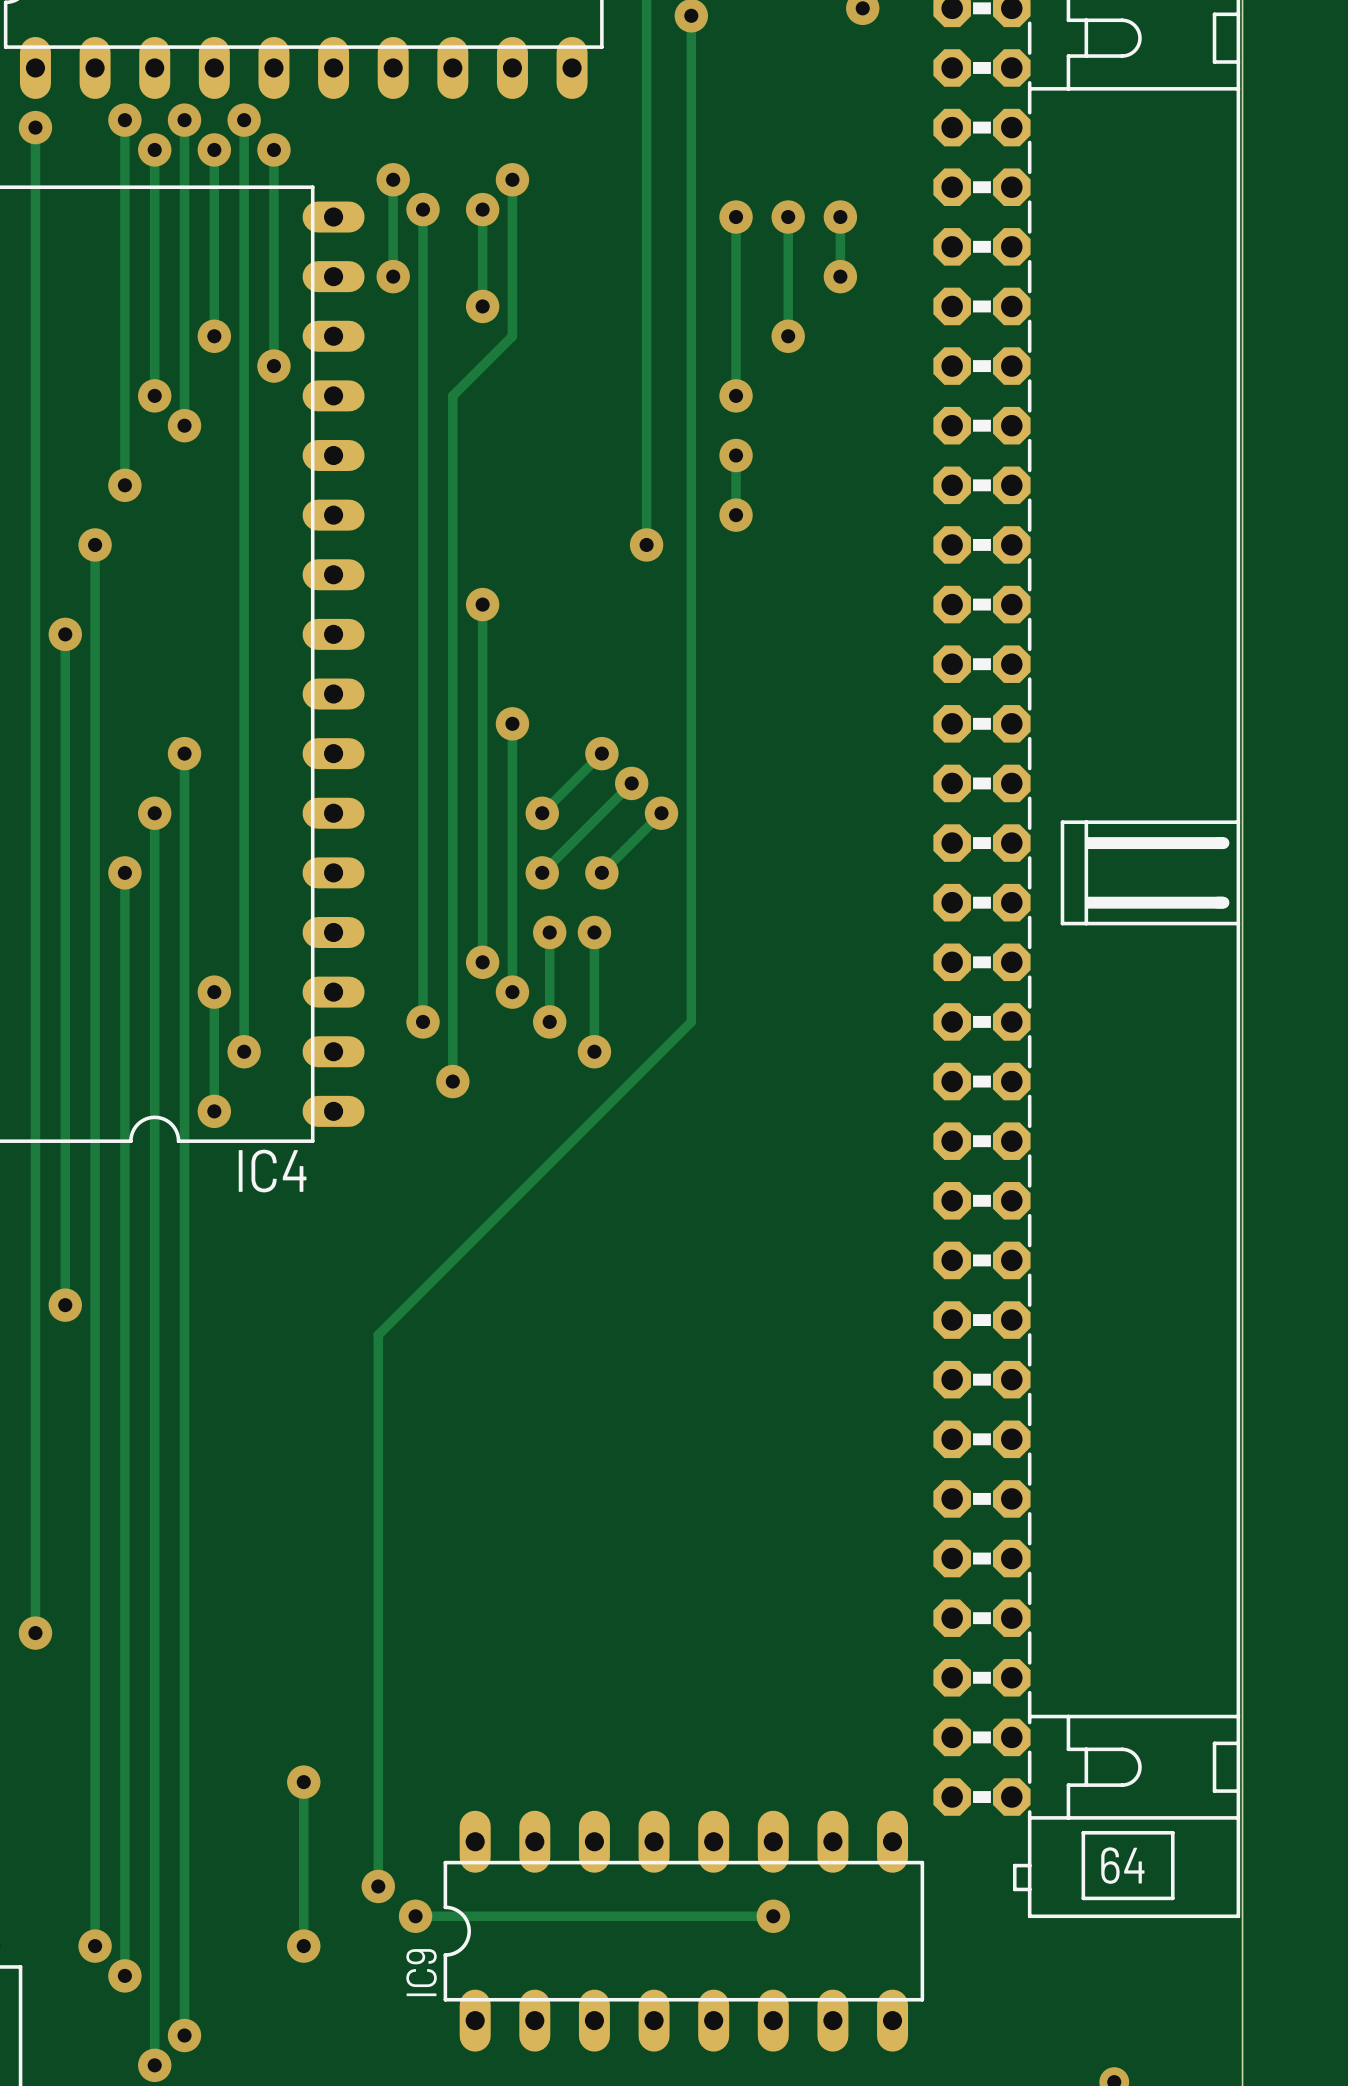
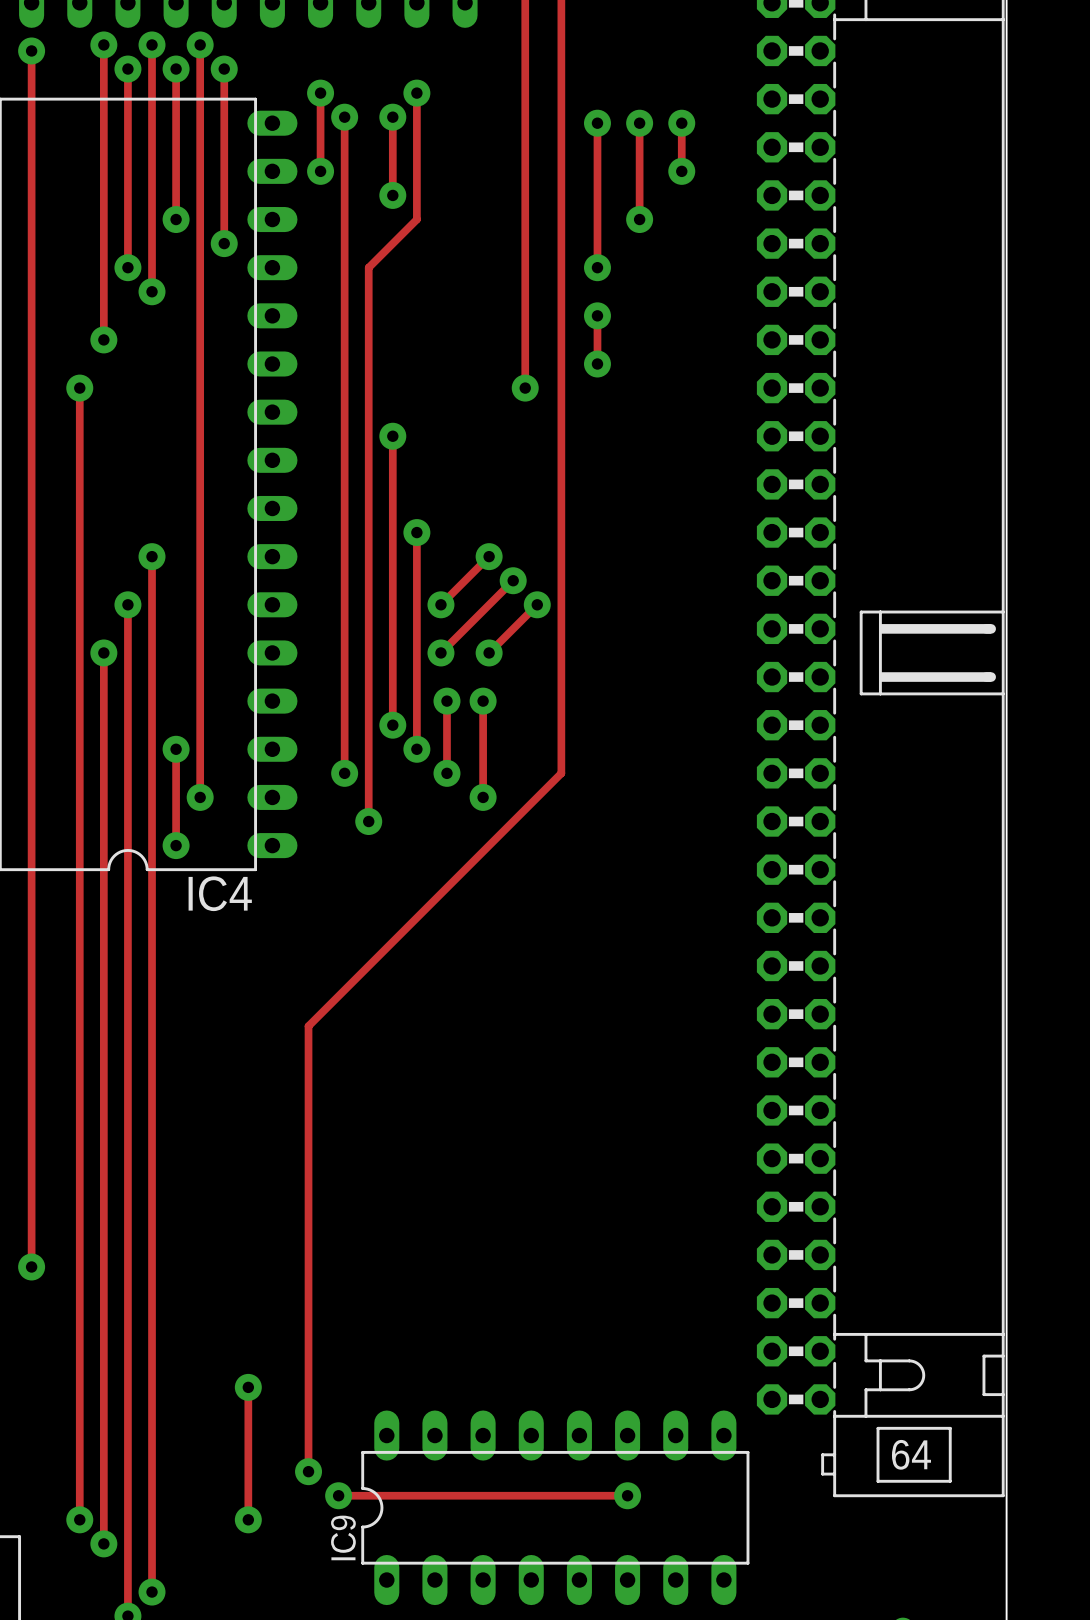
track: (65, 634) (65, 1305) -> none
via: (65, 634) -> none
via: (65, 1305) -> none

